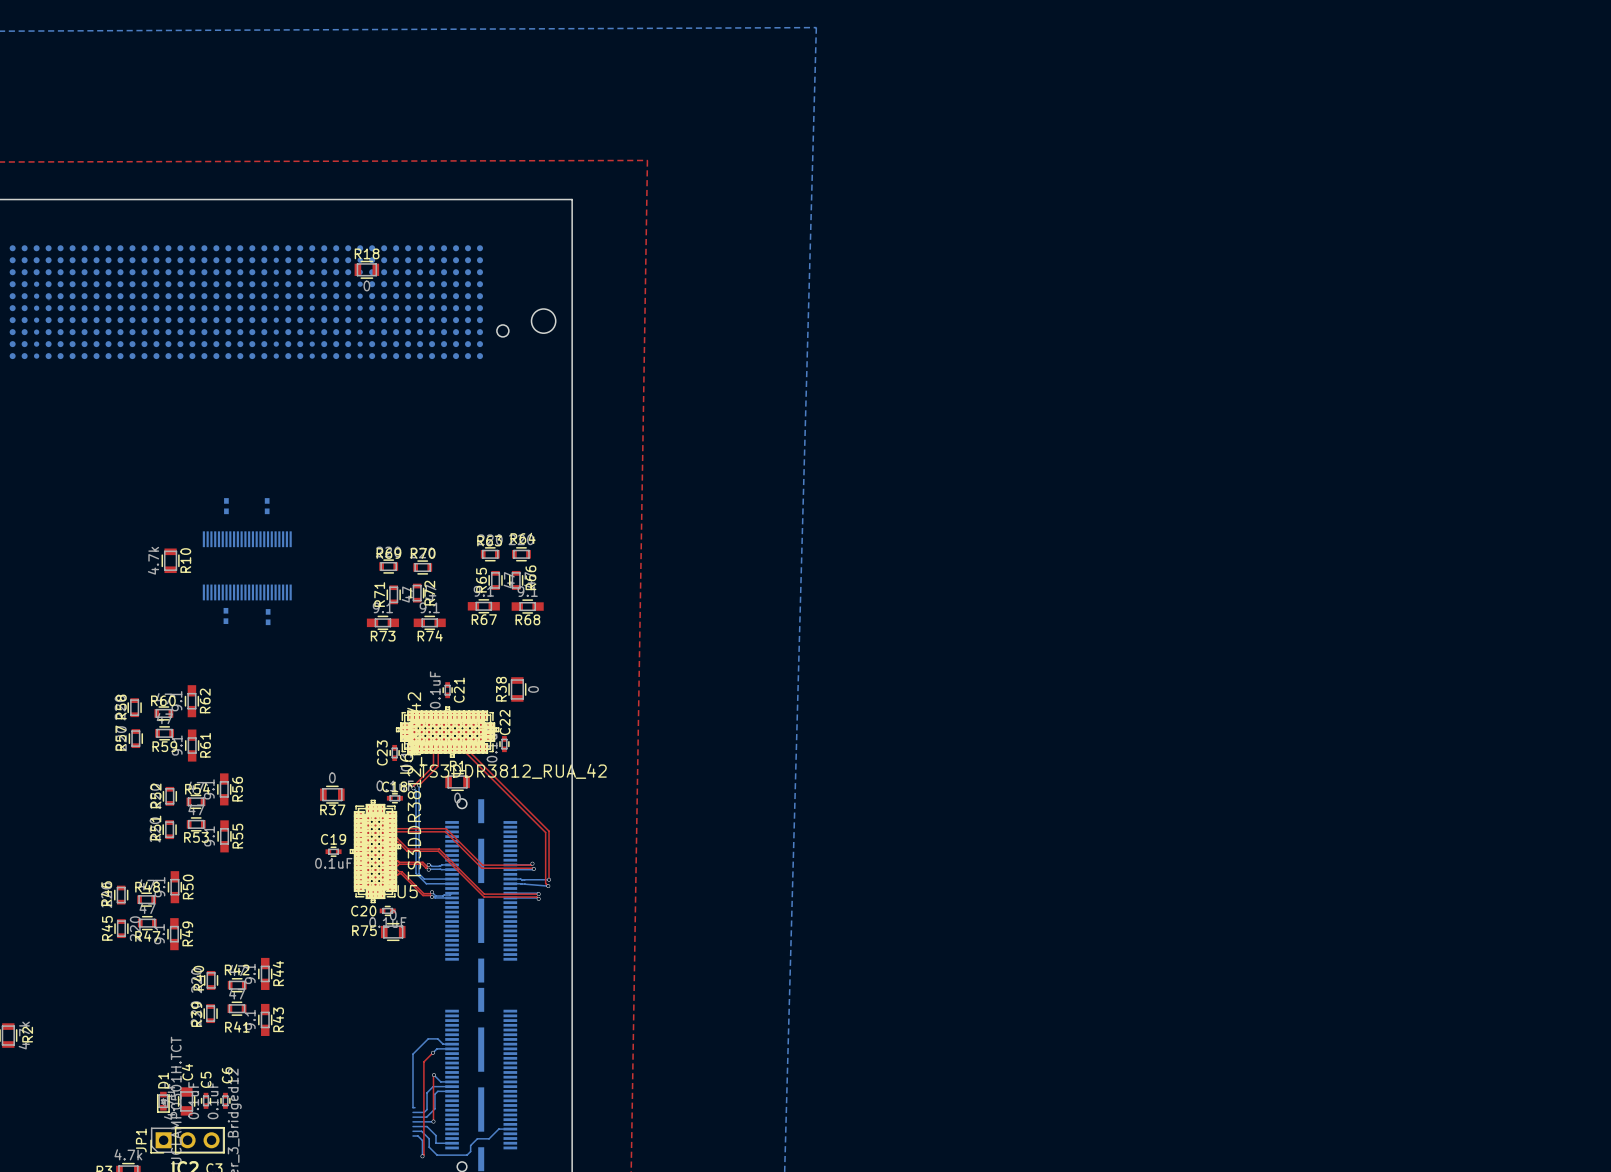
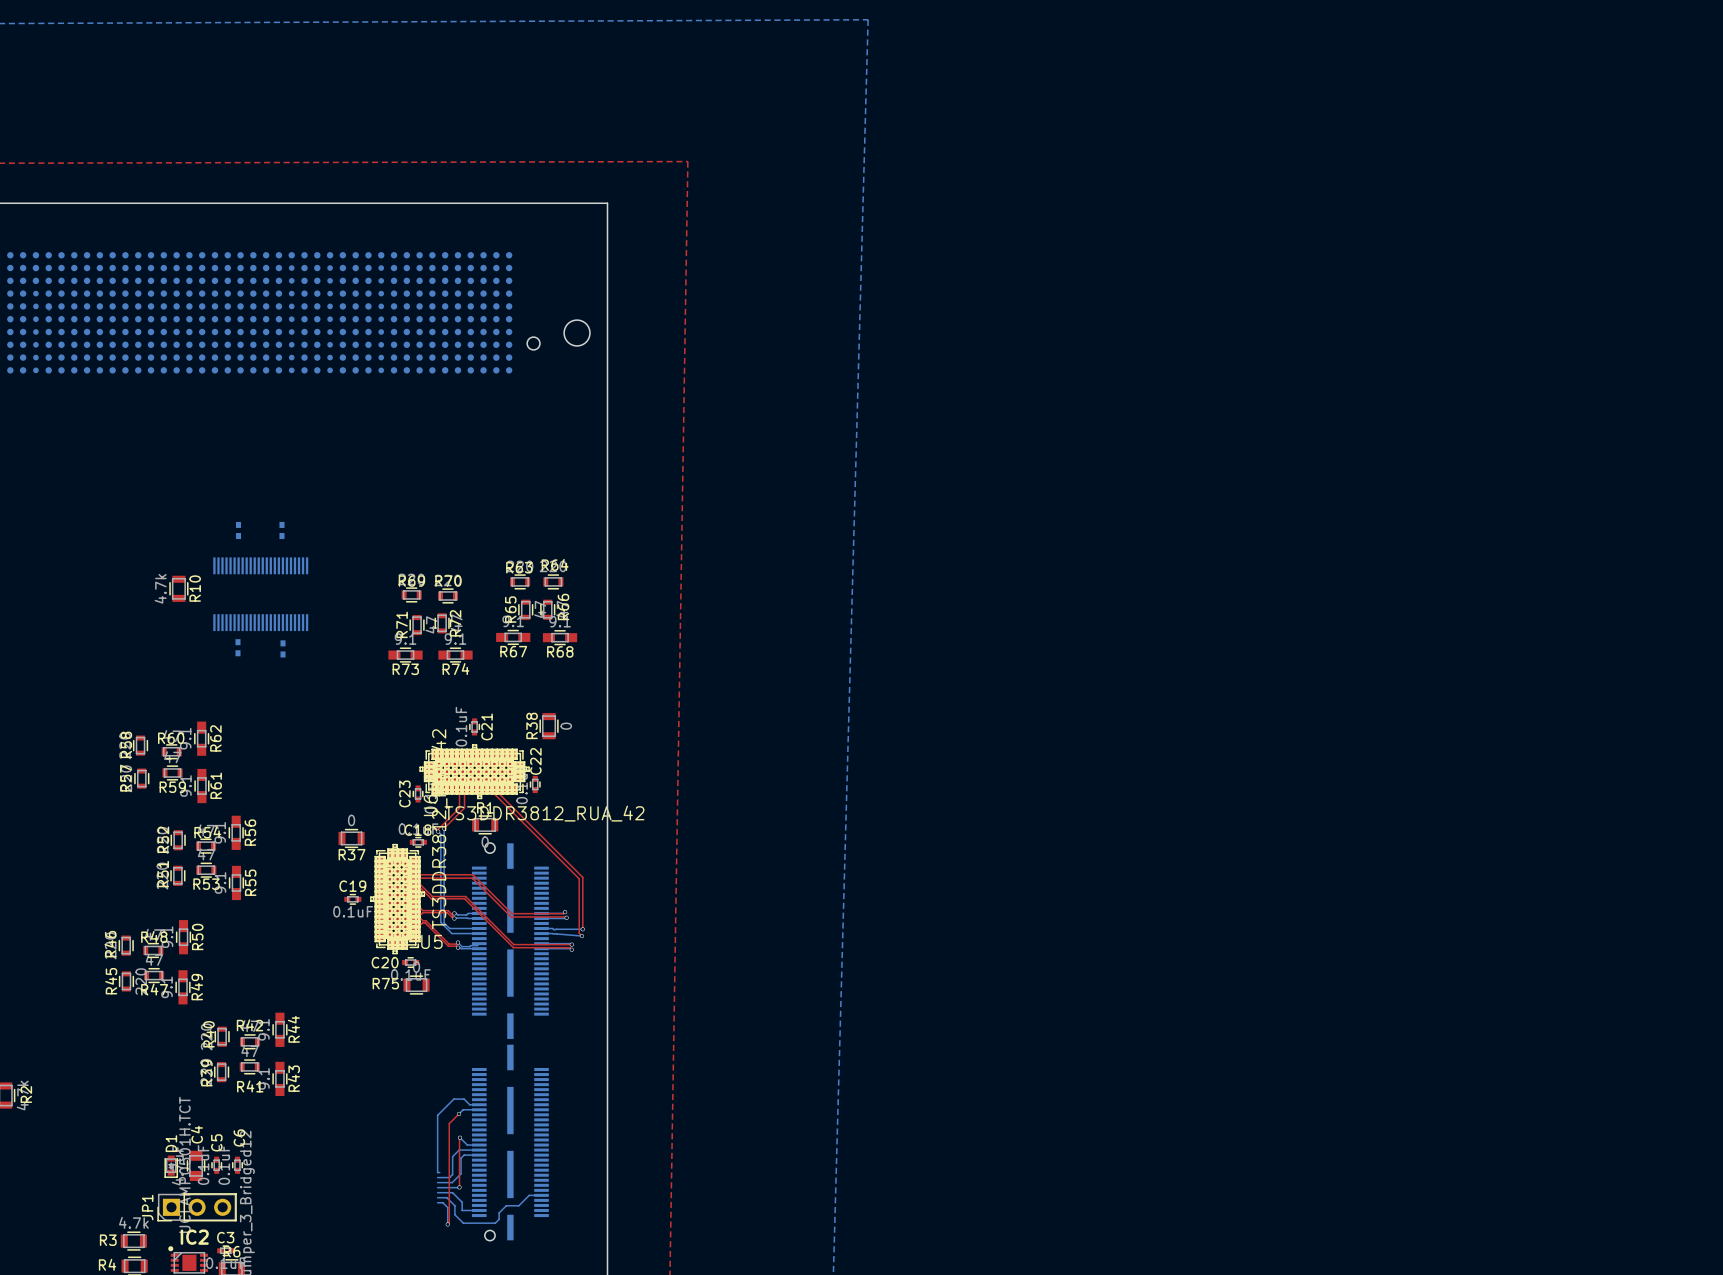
R18: 0 (366, 269) -> none

